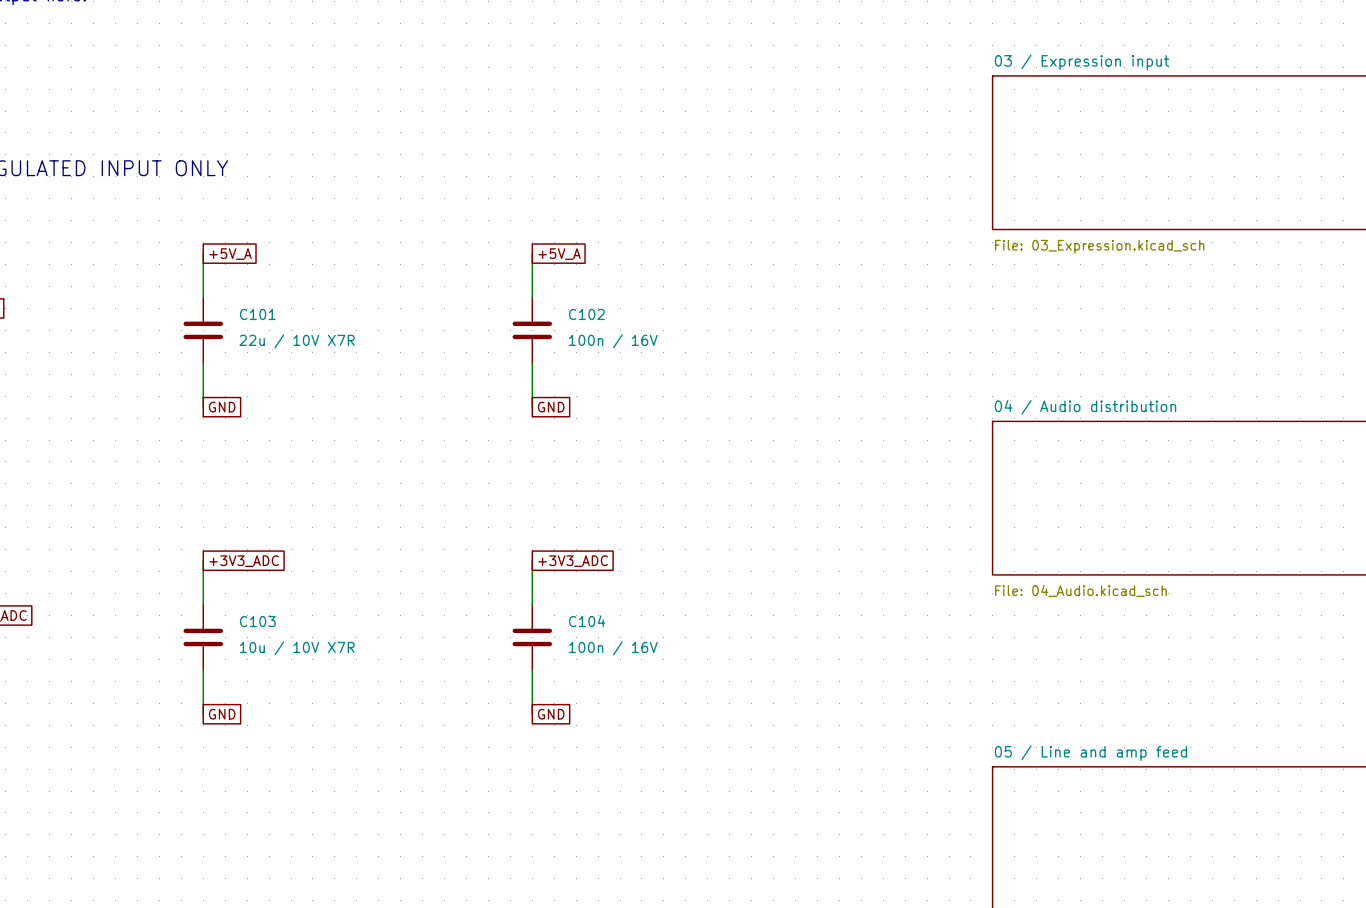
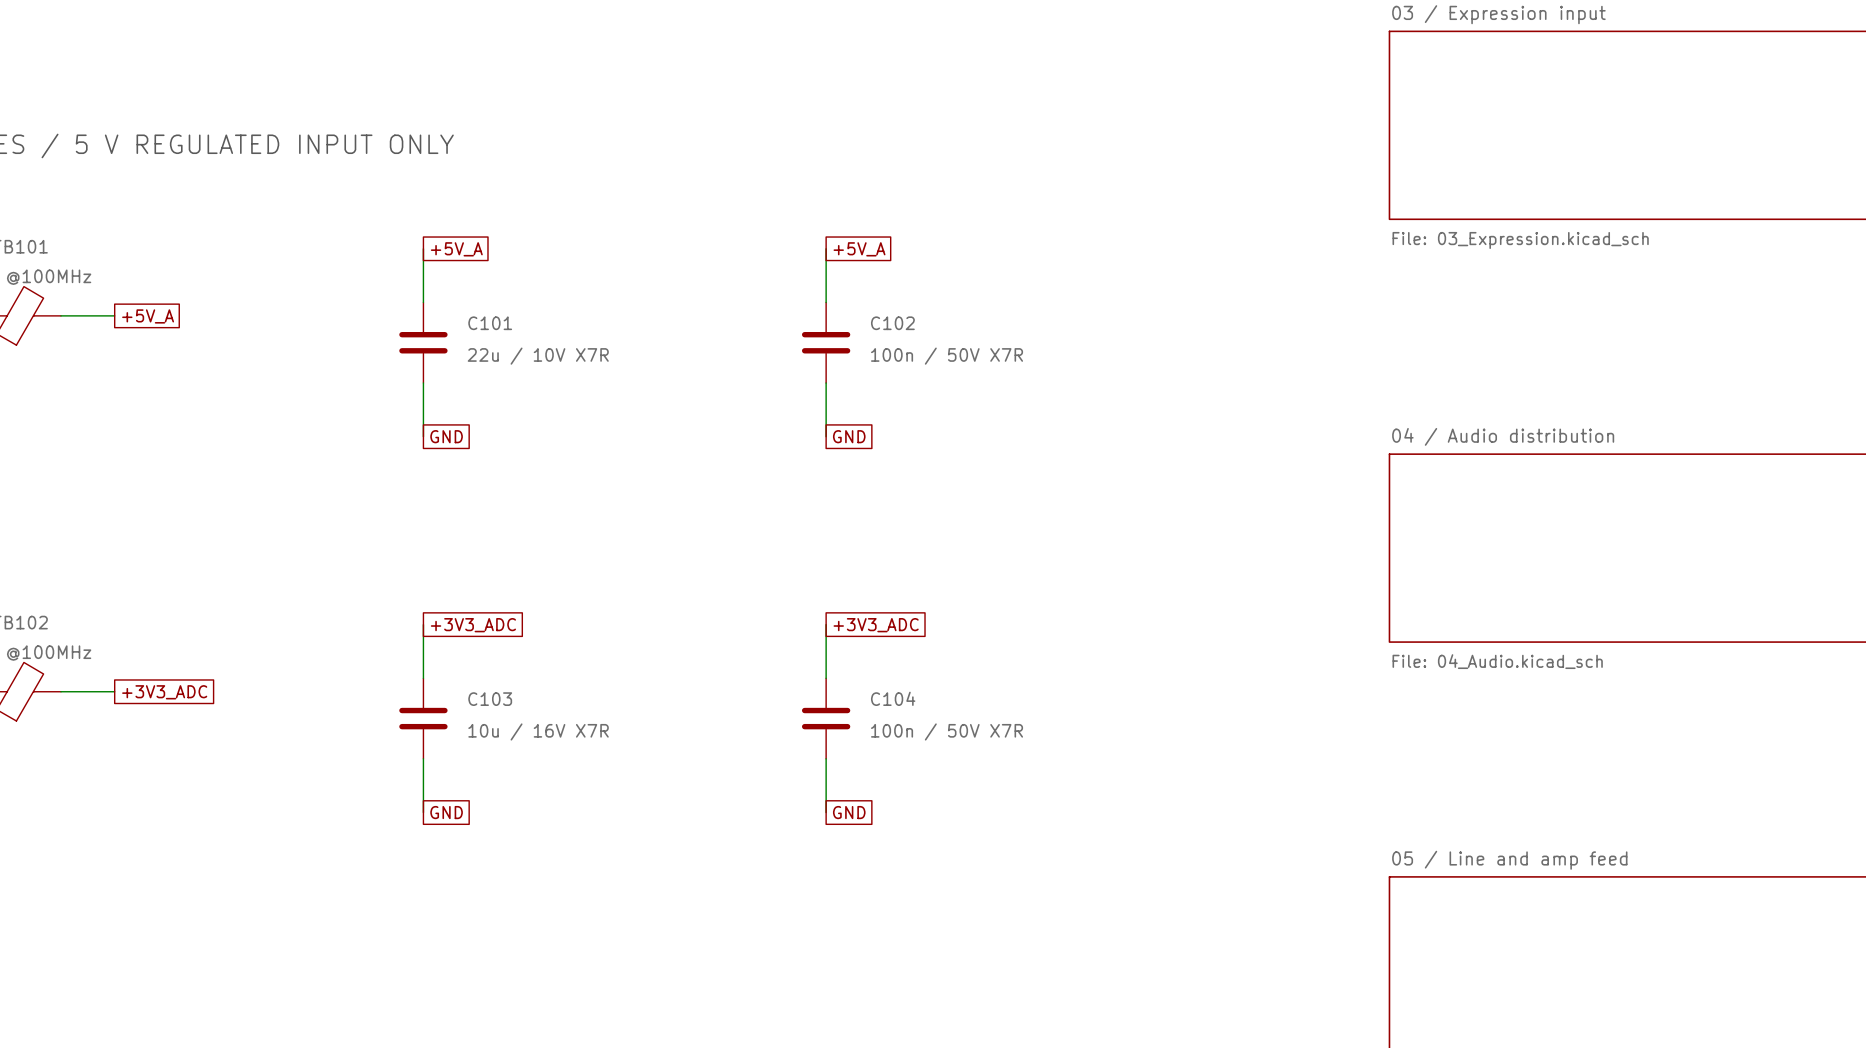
C102 value: 100n / 16V (613, 341) -> 100n / 50V X7R (947, 356)
C103 value: 10u / 10V X7R (297, 648) -> 10u / 16V X7R (538, 731)
C104 value: 100n / 16V (613, 648) -> 100n / 50V X7R (947, 731)

